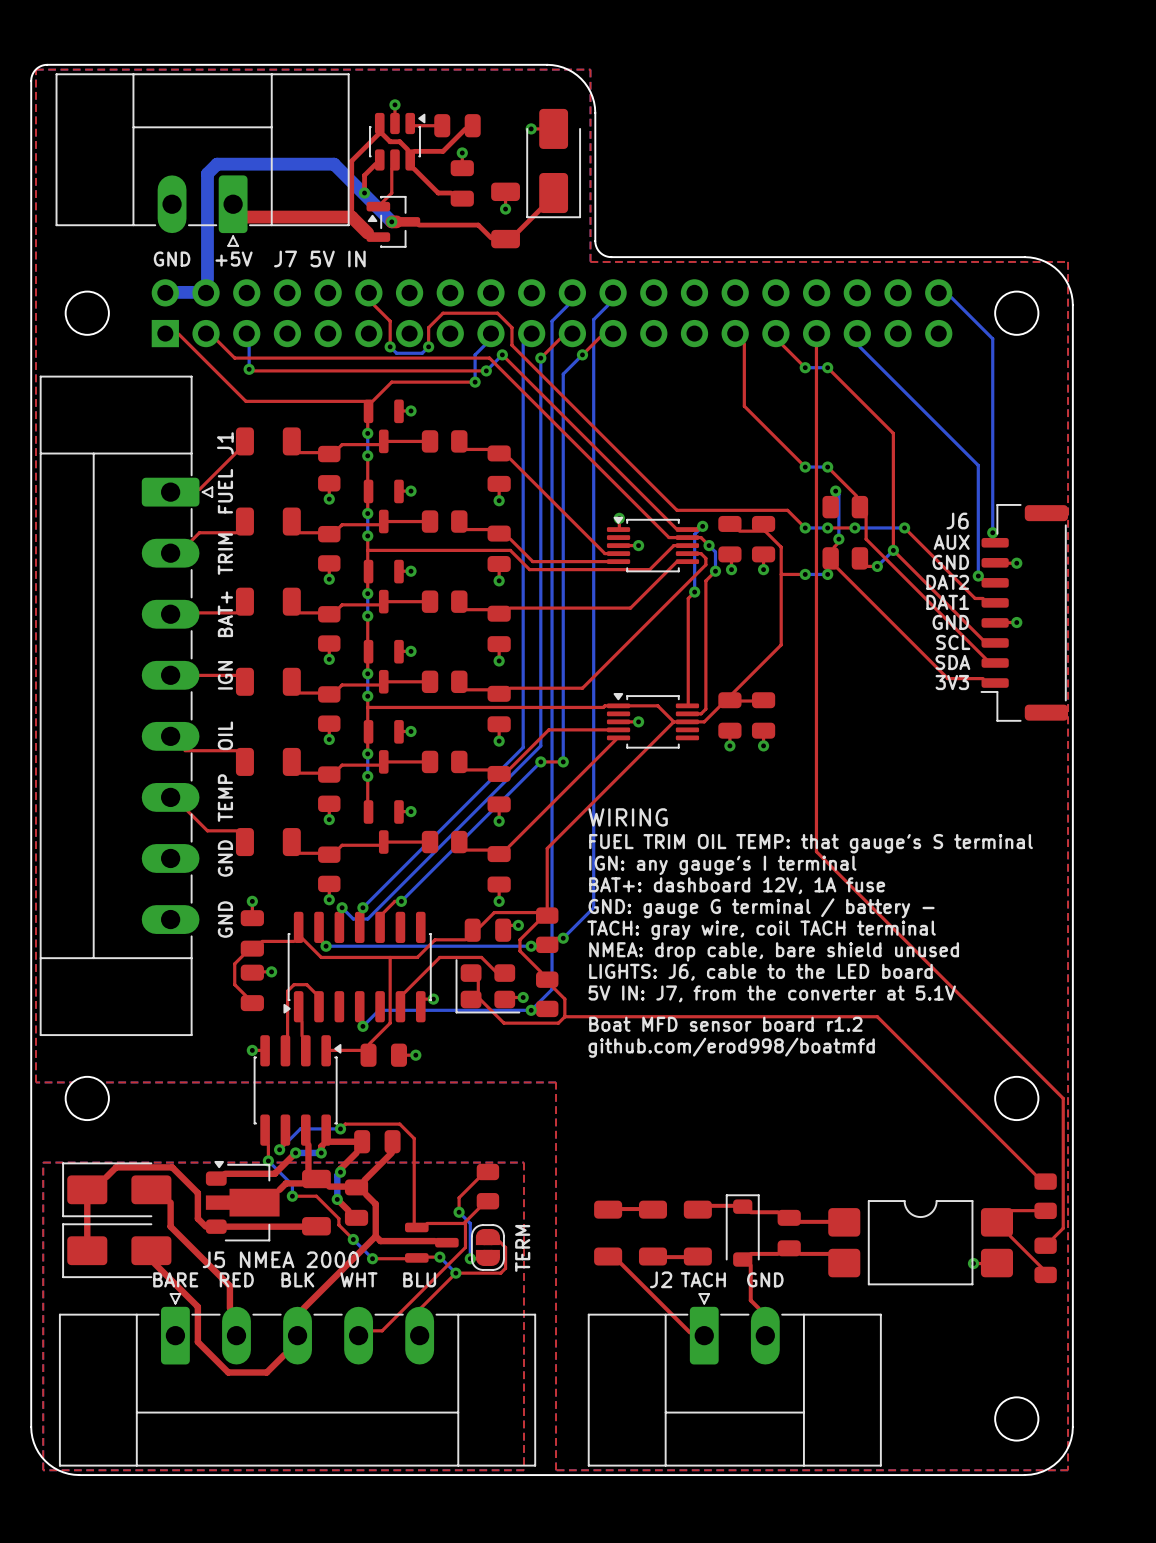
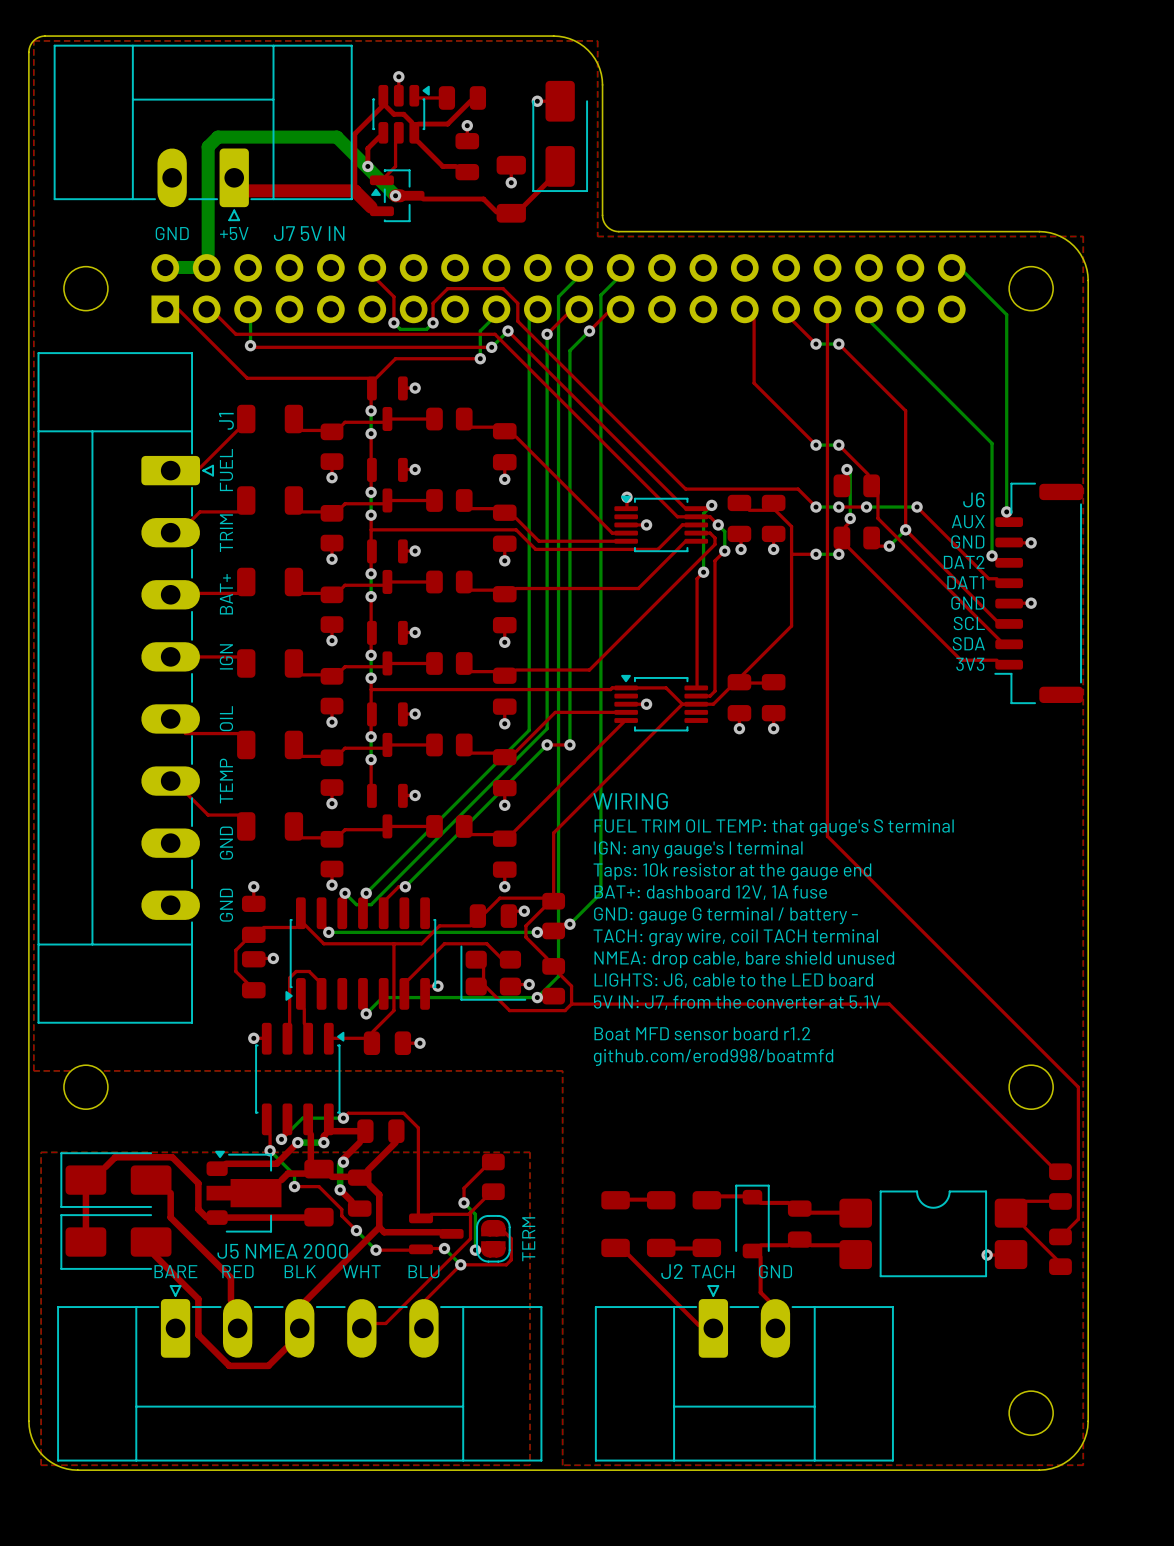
text: BAT+: dashboard 12V, 1A fuse (737, 885) -> Taps: 10k resistor at the gauge end (732, 871)
text: GND: gauge G terminal / battery - (761, 908) -> BAT+: dashboard 12V, 1A fuse (710, 892)
text: TACH: gray wire, coil TACH terminal (761, 930) -> GND: gauge G terminal / battery - (725, 915)
text: NMEA: drop cable, bare shield unused (774, 951) -> TACH: gray wire, coil TACH terminal (735, 937)
text: LIGHTS: J6, cable to the LED board (760, 972) -> NMEA: drop cable, bare shield unused (744, 959)
text: 5V IN: J7, from the converter at 5.1V (772, 993) -> LIGHTS: J6, cable to the LED board (733, 980)
text: Boat MFD sensor board r1.2 (725, 1024) -> 5V IN: J7, from the converter at 5.1V (737, 1002)
text: github.com/erod998/boatmfd (731, 1047) -> Boat MFD sensor board r1.2 (702, 1033)
text: none -> github.com/erod998/boatmfd (713, 1057)

